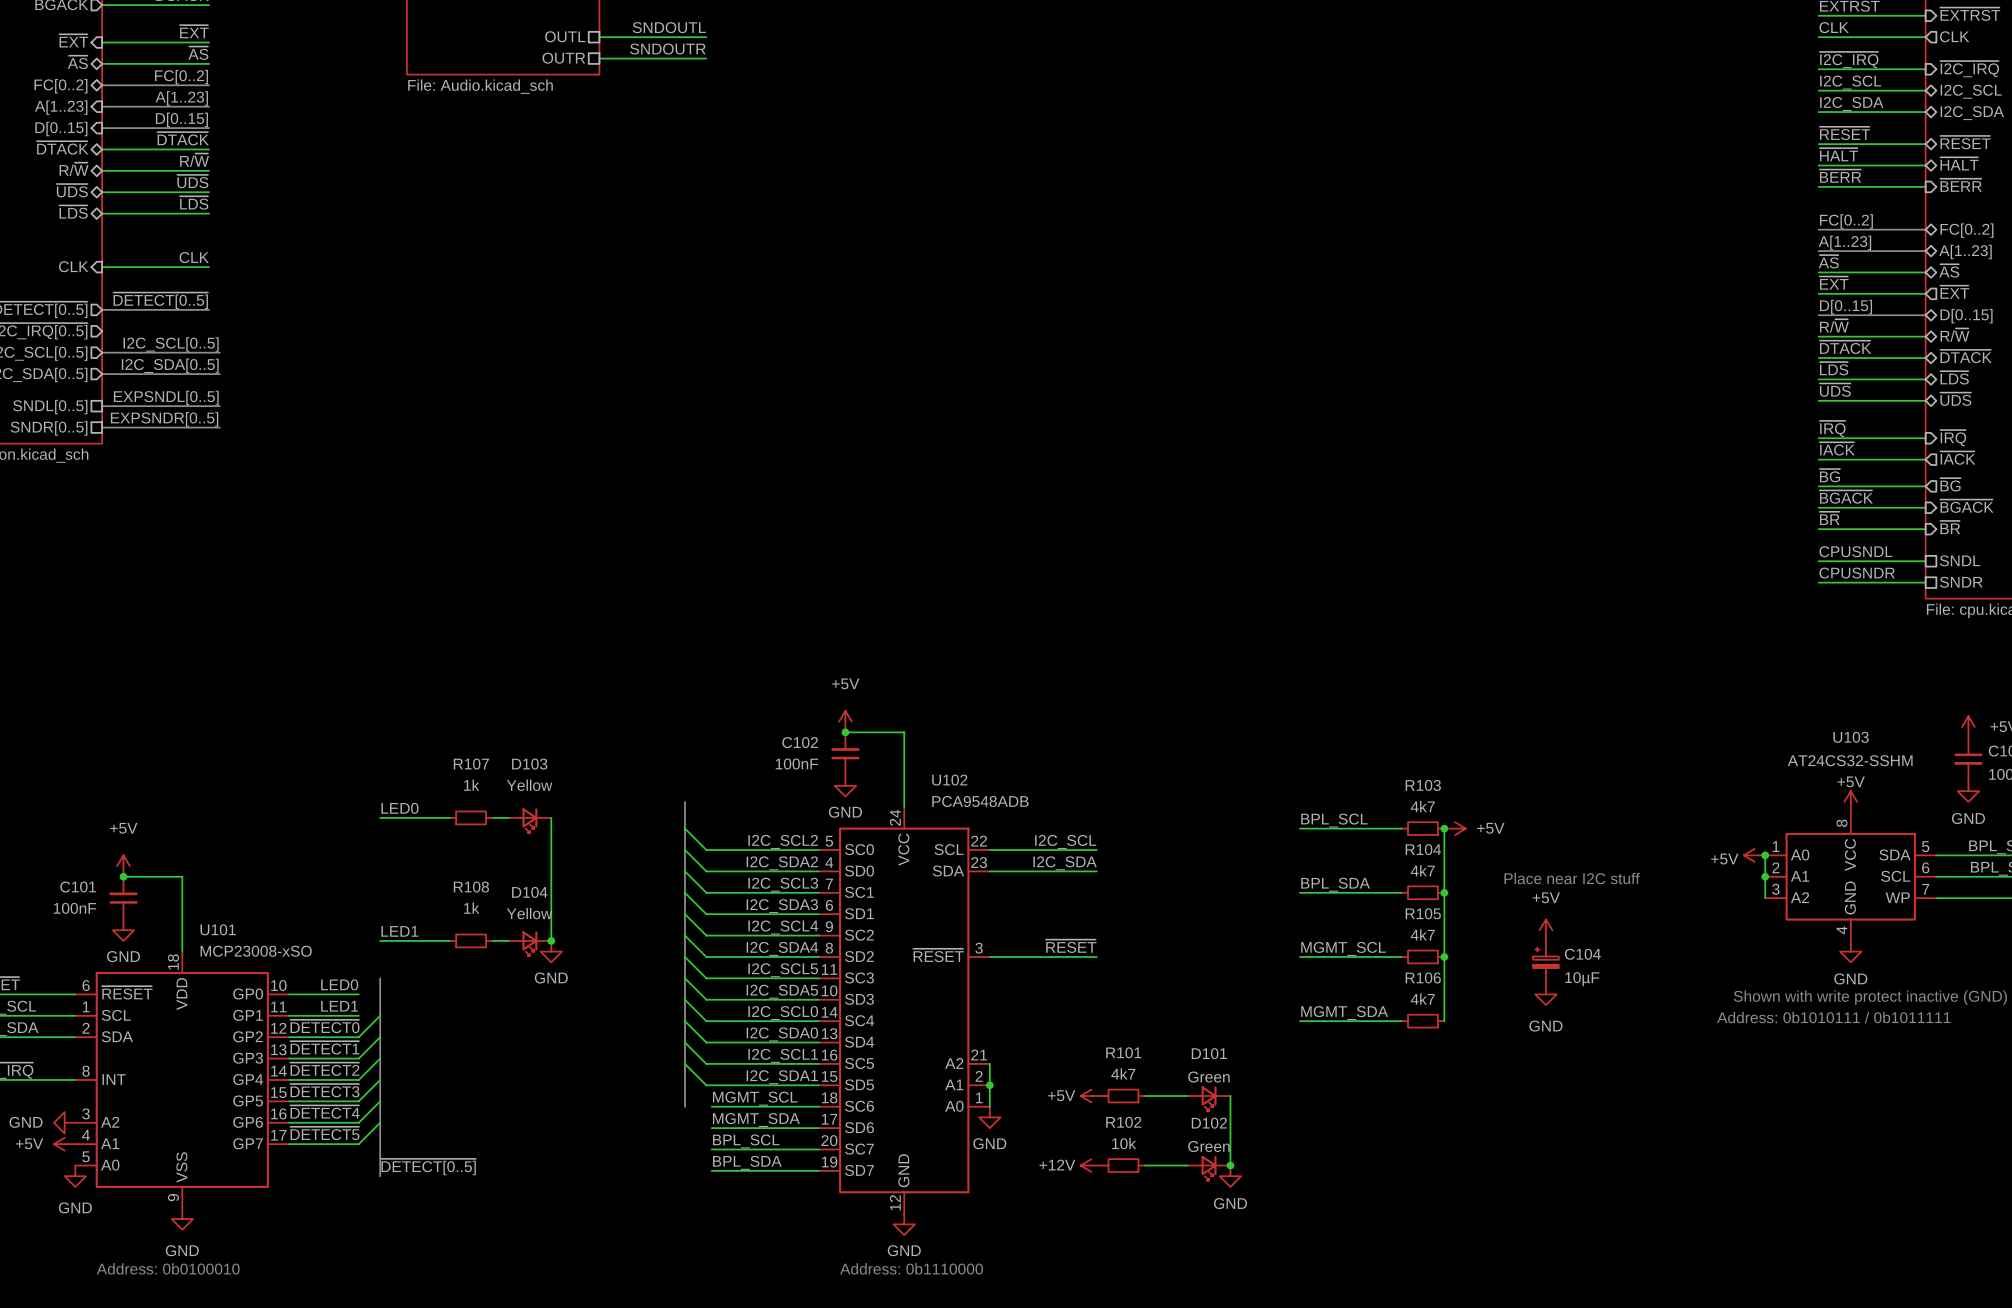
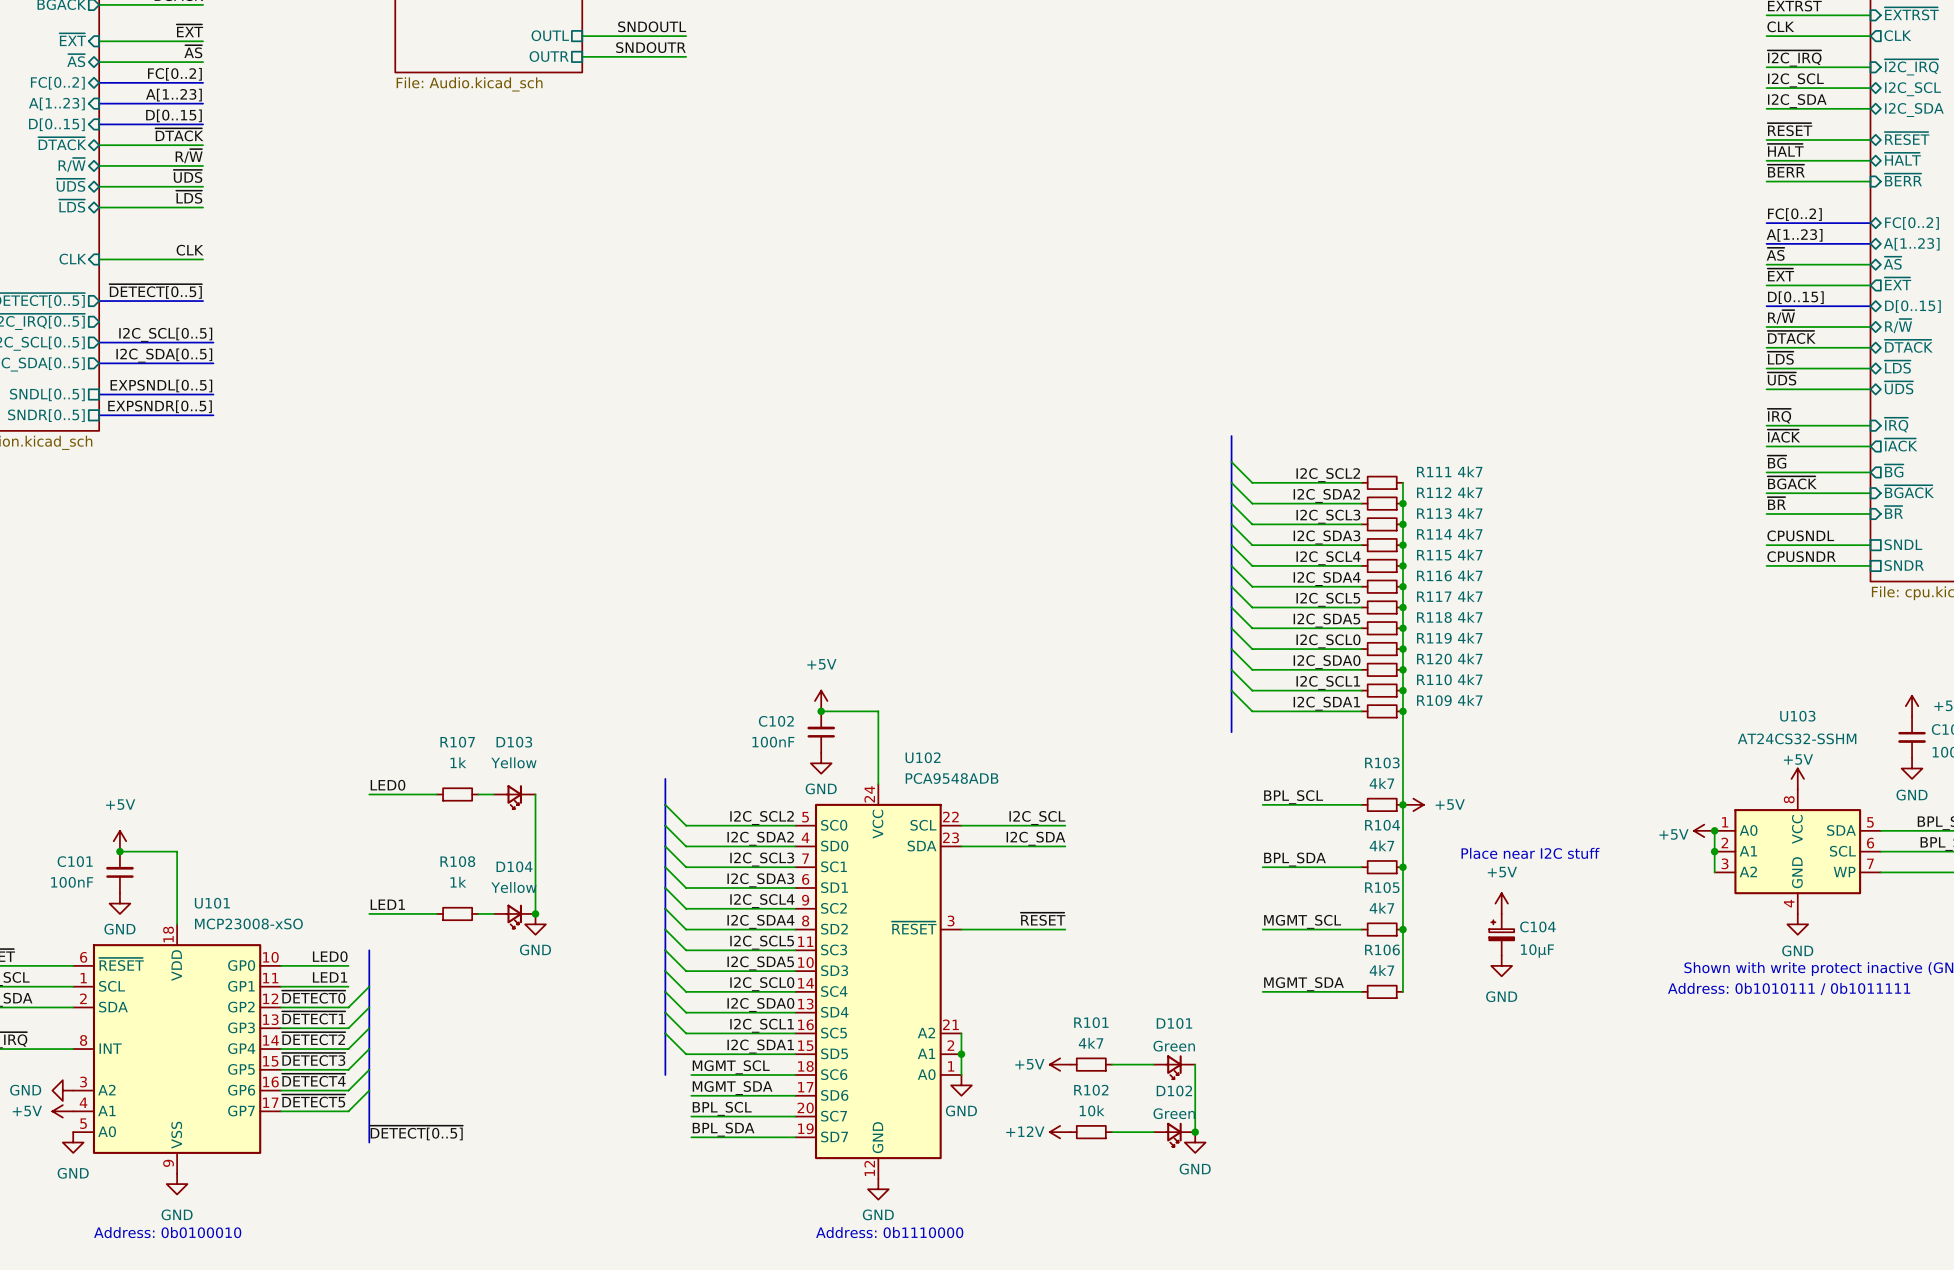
bus: none -> (1231, 436) (1231, 732)
wire: none -> (1231, 462) (1252, 482) (1361, 482)
label: none -> I2C_SCL2 (1328, 475)
wire: none -> (1231, 482) (1252, 503)
R111: none -> 4k7 (1382, 482)
wire: none -> (1402, 482) (1402, 804)
label: none -> I2C_SDA2 (1326, 495)
wire: none -> (1231, 503) (1252, 524) (1361, 524)
wire: none -> (1252, 503) (1361, 503)
R112: none -> 4k7 (1382, 503)
junction: none -> (1402, 503)
label: none -> I2C_SCL3 (1328, 516)
wire: none -> (1231, 524) (1252, 545)
R113: none -> 4k7 (1382, 524)
junction: none -> (1402, 524)
label: none -> I2C_SDA3 (1326, 537)
wire: none -> (1231, 545) (1252, 565) (1361, 565)
wire: none -> (1252, 545) (1361, 545)
R114: none -> 4k7 (1382, 545)
junction: none -> (1402, 545)
label: none -> I2C_SCL4 (1328, 558)
wire: none -> (1231, 565) (1252, 586) (1361, 586)
R115: none -> 4k7 (1382, 565)
junction: none -> (1402, 565)
label: none -> I2C_SDA4 (1327, 579)
wire: none -> (1231, 586) (1252, 607)
R116: none -> 4k7 (1382, 586)
junction: none -> (1402, 586)
label: none -> I2C_SCL5 (1328, 599)
wire: none -> (1231, 607) (1252, 628) (1361, 628)
wire: none -> (1252, 607) (1361, 607)
R117: none -> 4k7 (1382, 607)
junction: none -> (1402, 607)
label: none -> I2C_SDA5 (1326, 620)
wire: none -> (1231, 628) (1252, 649)
R118: none -> 4k7 (1382, 628)
junction: none -> (1402, 628)
label: none -> I2C_SCL0 (1328, 641)
wire: none -> (1231, 649) (1252, 669) (1361, 669)
wire: none -> (1252, 649) (1361, 649)
R119: none -> 4k7 (1382, 649)
junction: none -> (1402, 649)
label: none -> I2C_SDA0 (1327, 662)
wire: none -> (1231, 669) (1252, 690)
R120: none -> 4k7 (1382, 669)
junction: none -> (1402, 669)
label: none -> I2C_SCL1 (1328, 682)
wire: none -> (1231, 690) (1252, 711) (1361, 711)
wire: none -> (1252, 690) (1361, 690)
R110: none -> 4k7 (1382, 690)
junction: none -> (1402, 690)
label: none -> I2C_SDA1 (1326, 703)
R109: none -> 4k7 (1382, 711)
junction: none -> (1402, 711)

